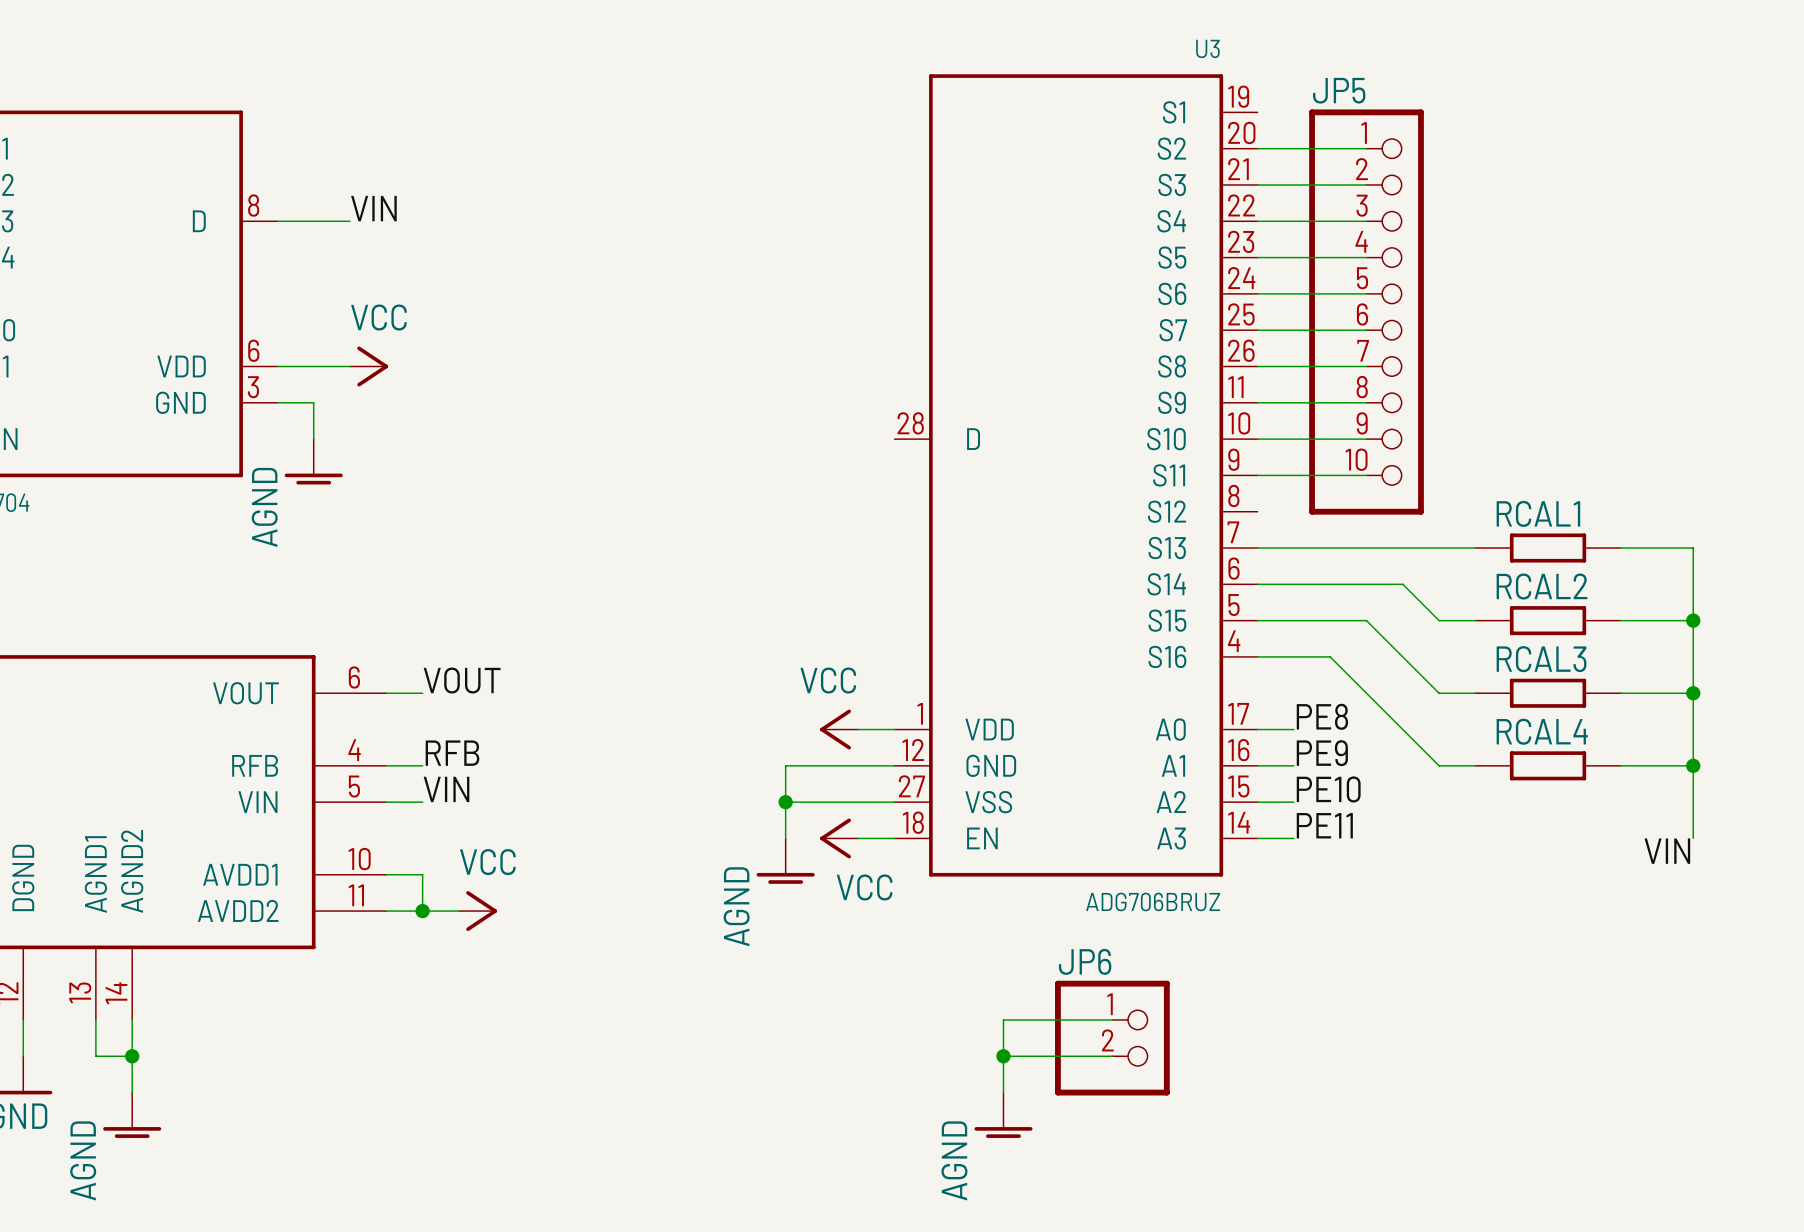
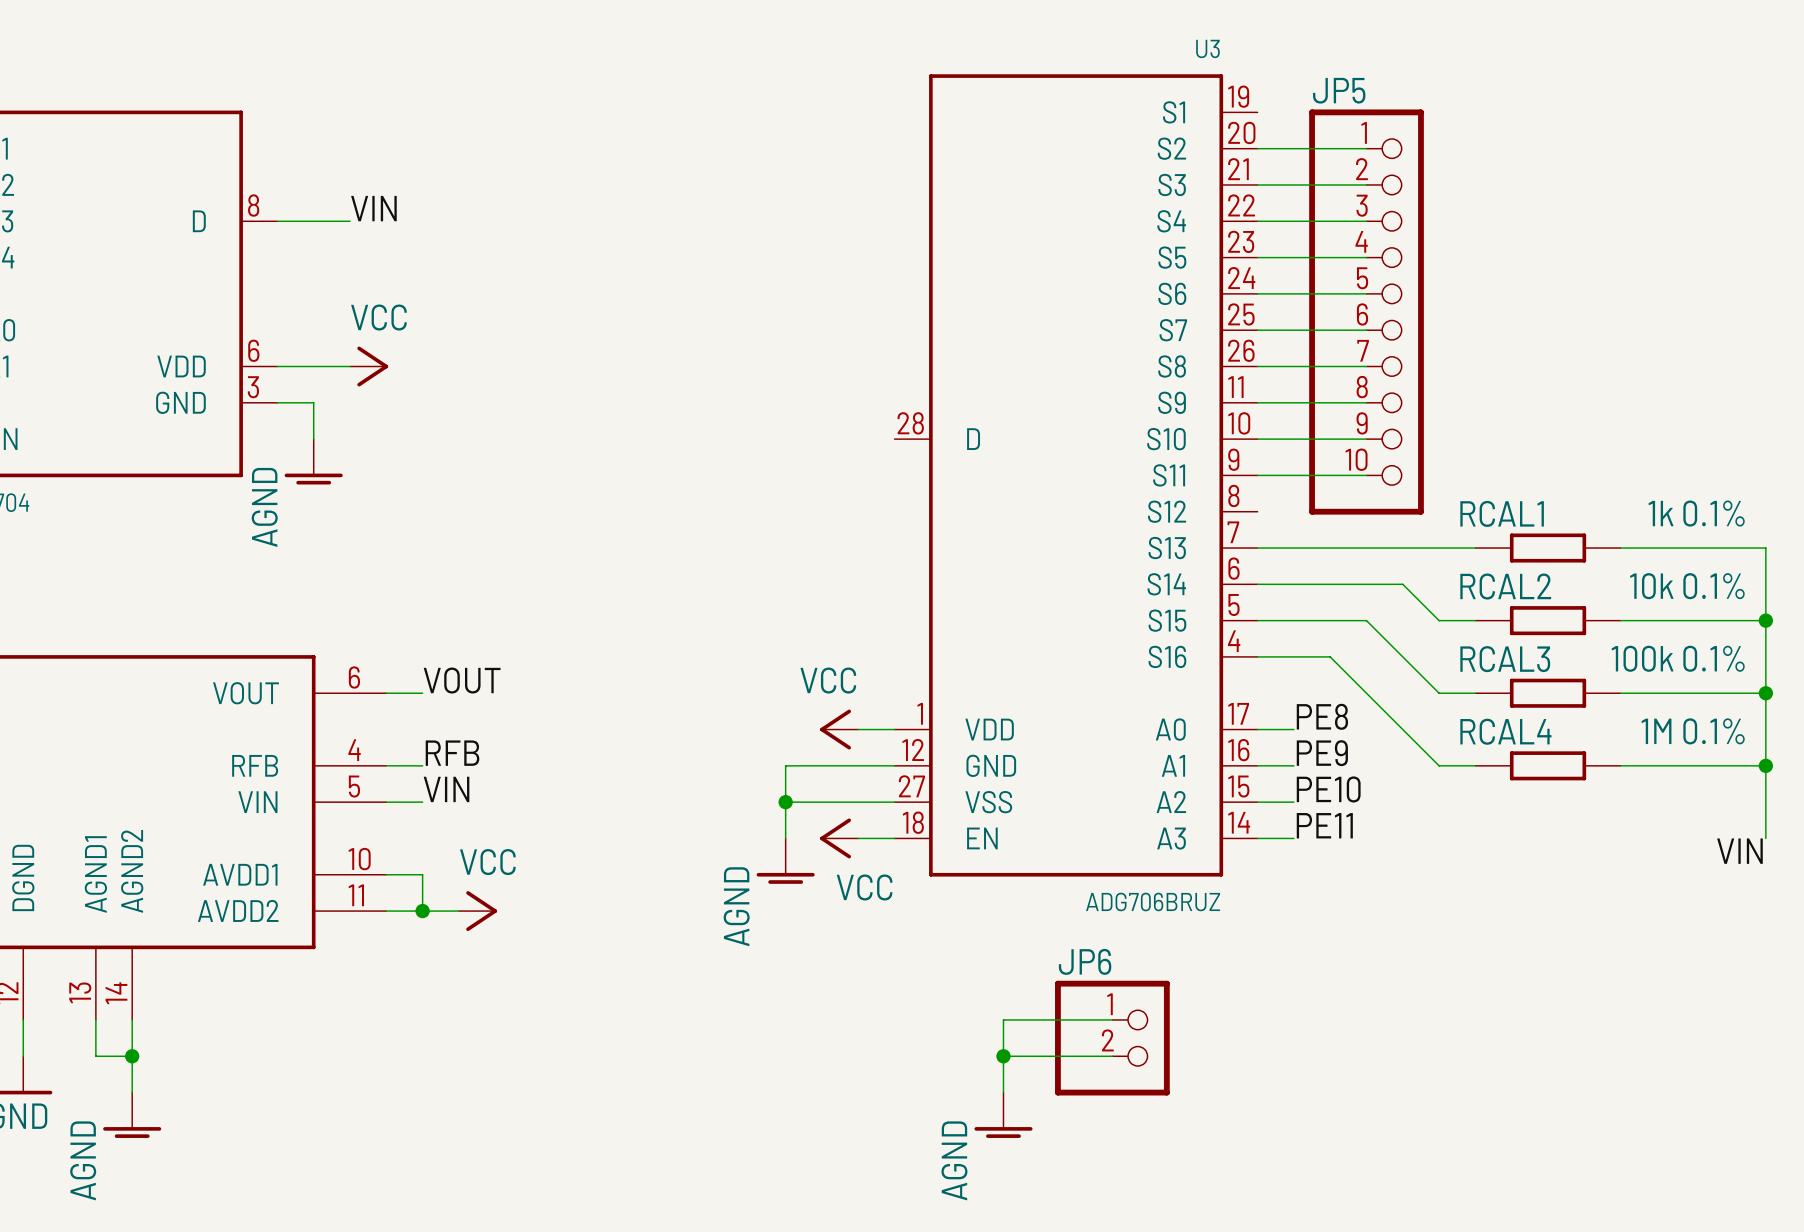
RCAL1 name position: RCAL1 (1538, 513) -> RCAL1 (1502, 513)
RCAL1 value: none -> 1k 0.1% (1696, 513)
wire: (1693, 548) (1693, 838) -> (1693, 548) (1765, 548) (1765, 838)
RCAL2 name position: RCAL2 (1542, 586) -> RCAL2 (1505, 586)
RCAL2 value: none -> 10k 0.1% (1687, 586)
wire: none -> (1693, 620) (1765, 620)
junction: (1693, 620) -> none
junction: none -> (1765, 620)
RCAL3 value: none -> 100k 0.1% (1678, 658)
RCAL3 name position: RCAL3 (1541, 659) -> RCAL3 (1505, 659)
wire: none -> (1693, 693) (1765, 693)
junction: (1693, 693) -> none
junction: none -> (1765, 693)
RCAL4 name position: RCAL4 (1542, 731) -> RCAL4 (1505, 731)
RCAL4 value: none -> 1M 0.1% (1693, 731)
wire: none -> (1693, 765) (1765, 765)
junction: (1693, 765) -> none
junction: none -> (1765, 765)
label position: VIN (1667, 851) -> VIN (1739, 851)

